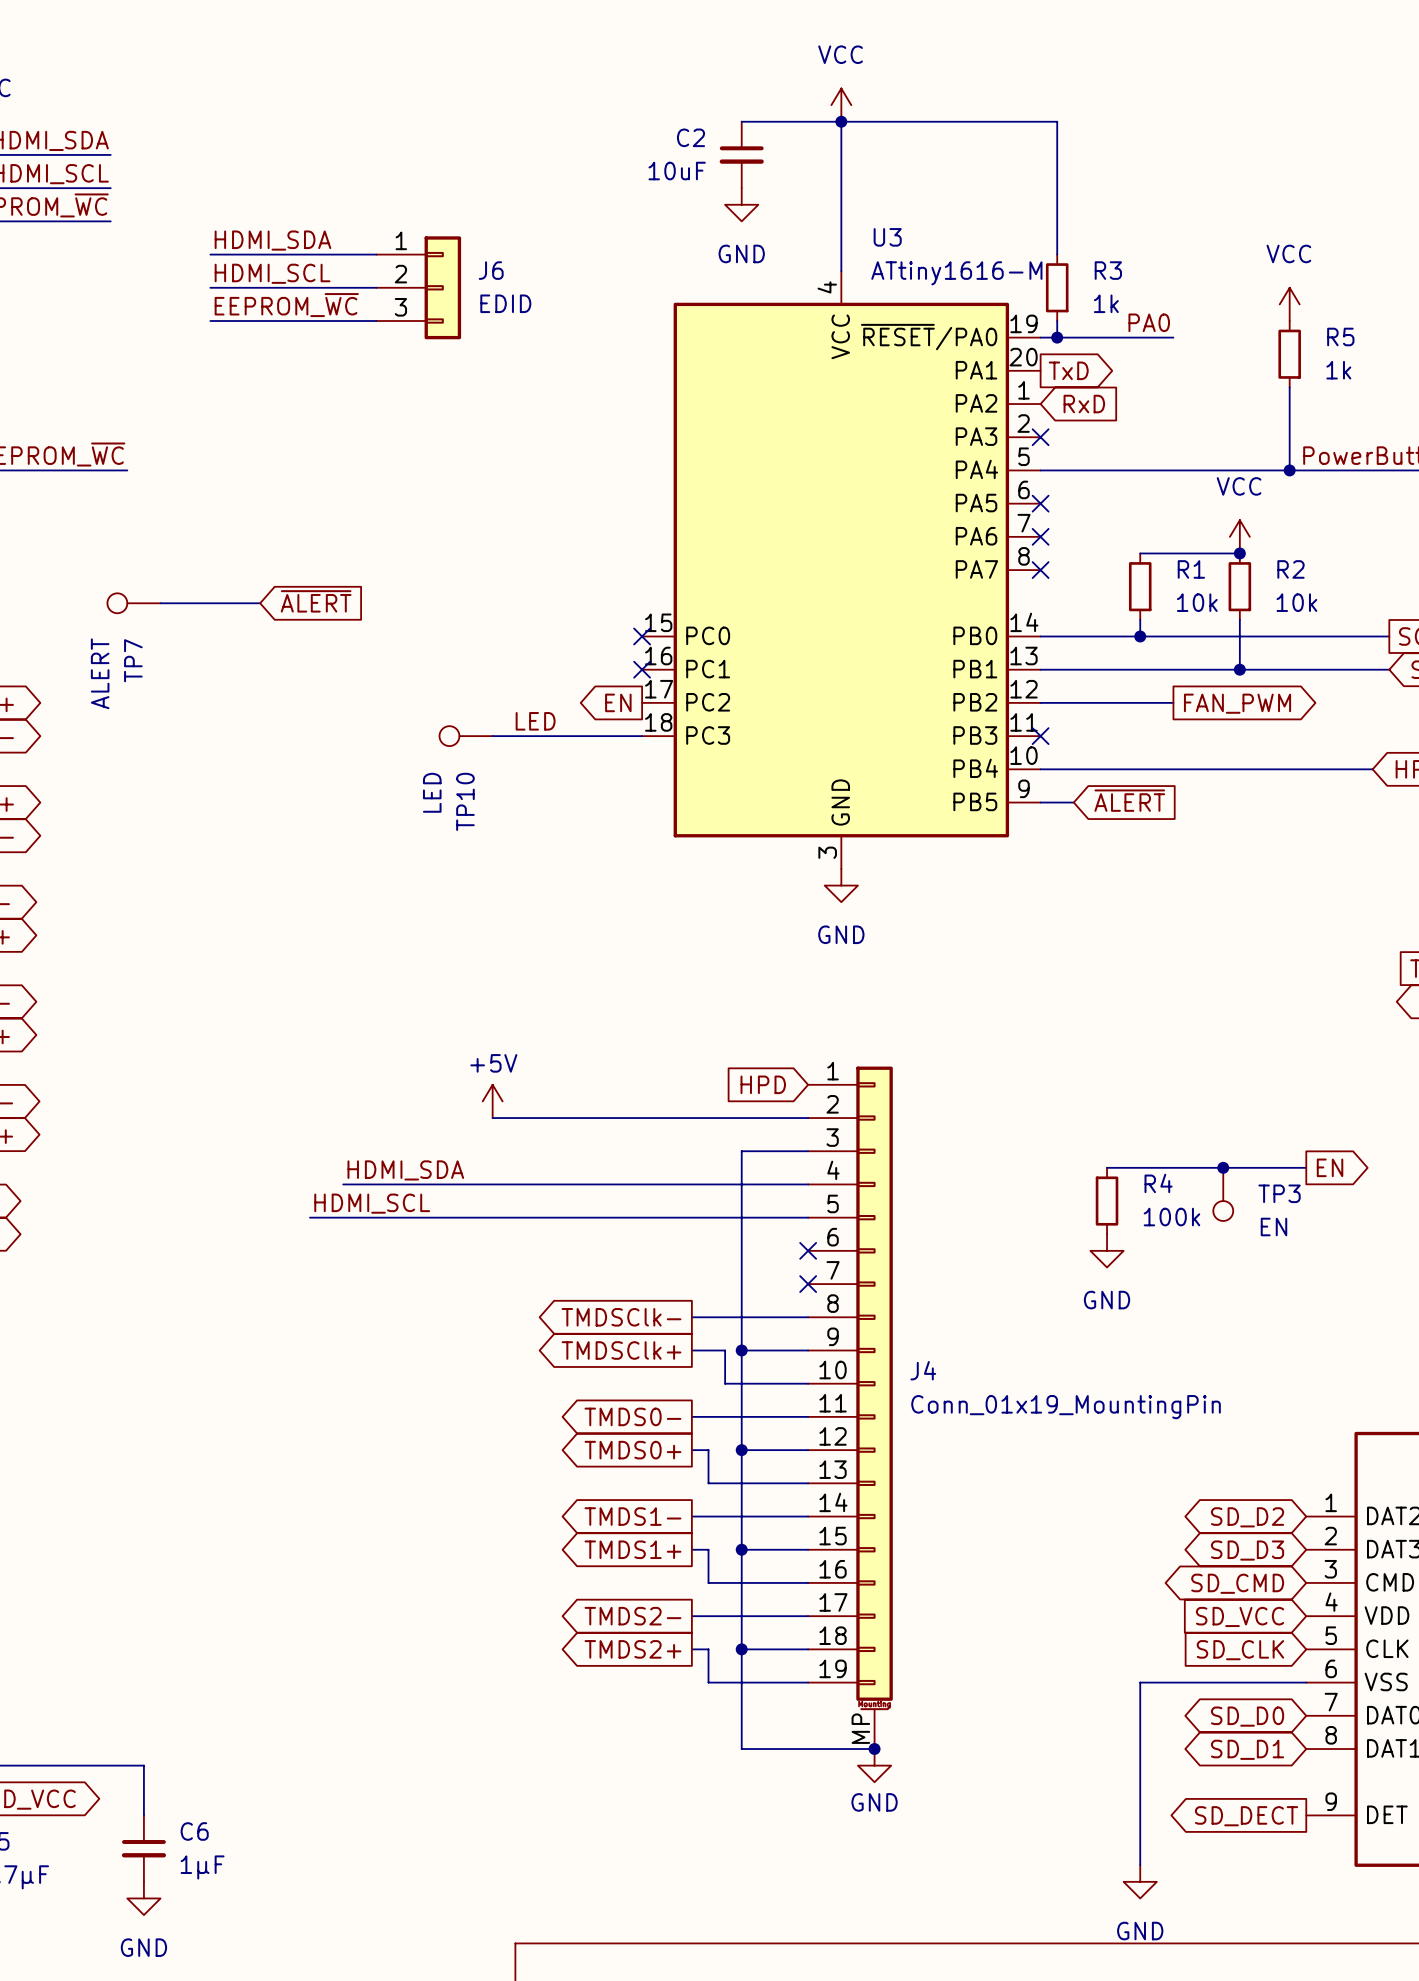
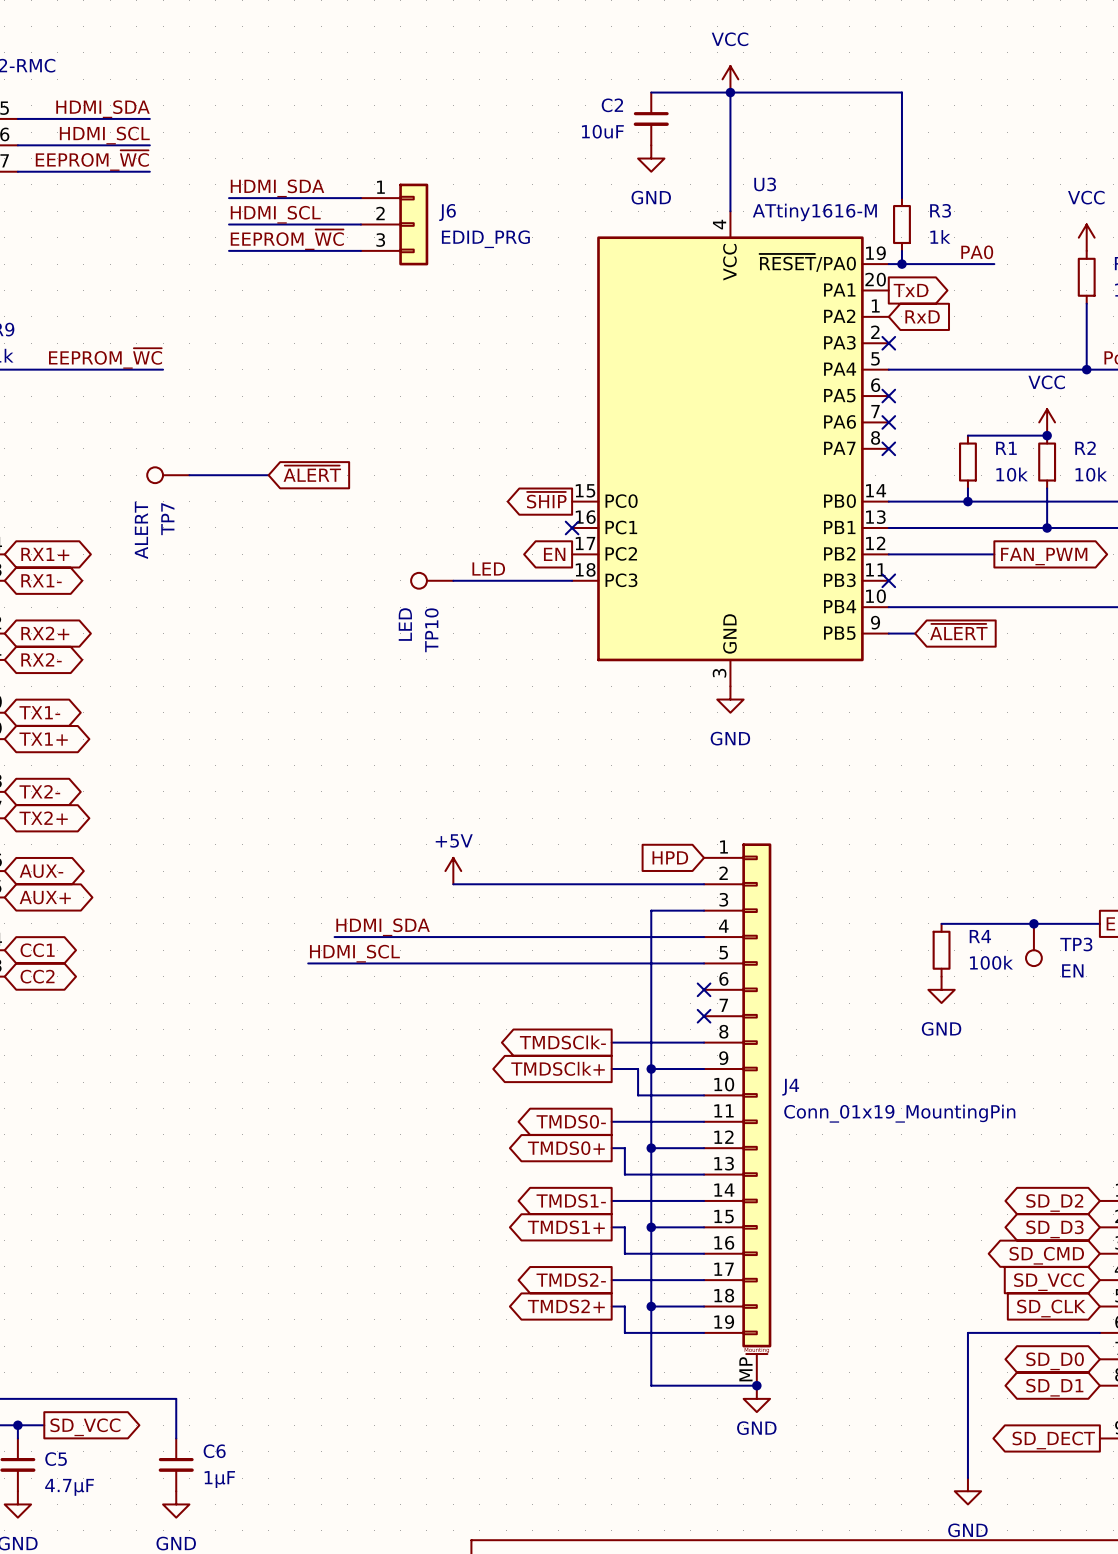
J6 value: EDID (505, 303) -> EDID_PRG (485, 239)
global label: none -> ~{SHIP} (546, 500)
no-connect mark: (642, 636) -> none

